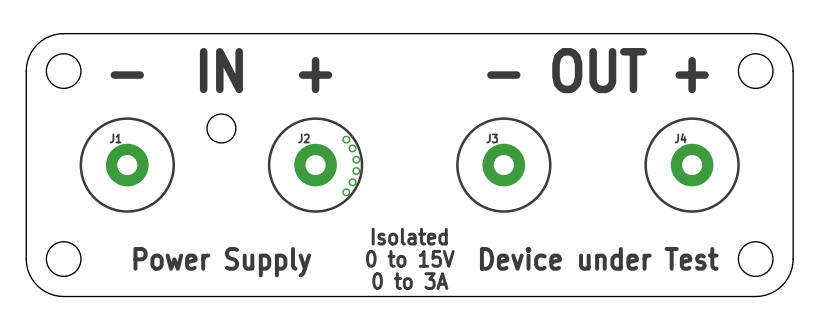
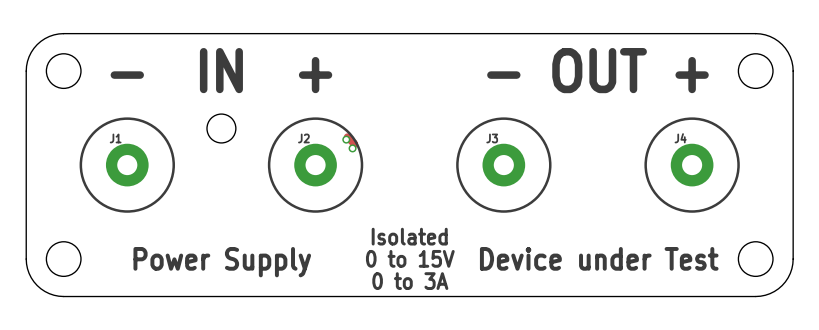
track: none -> (347, 137) (354, 144)
via: (356, 159) -> none
via: (356, 171) -> none
via: (352, 182) -> none
via: (346, 192) -> none

